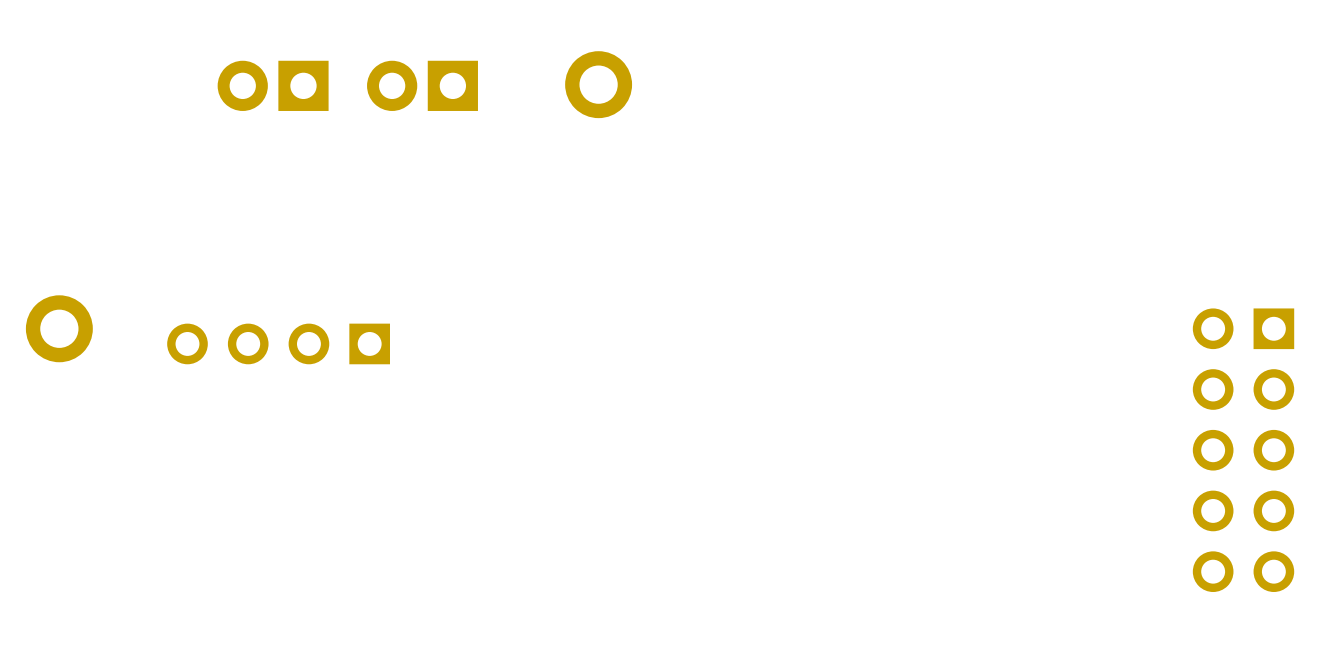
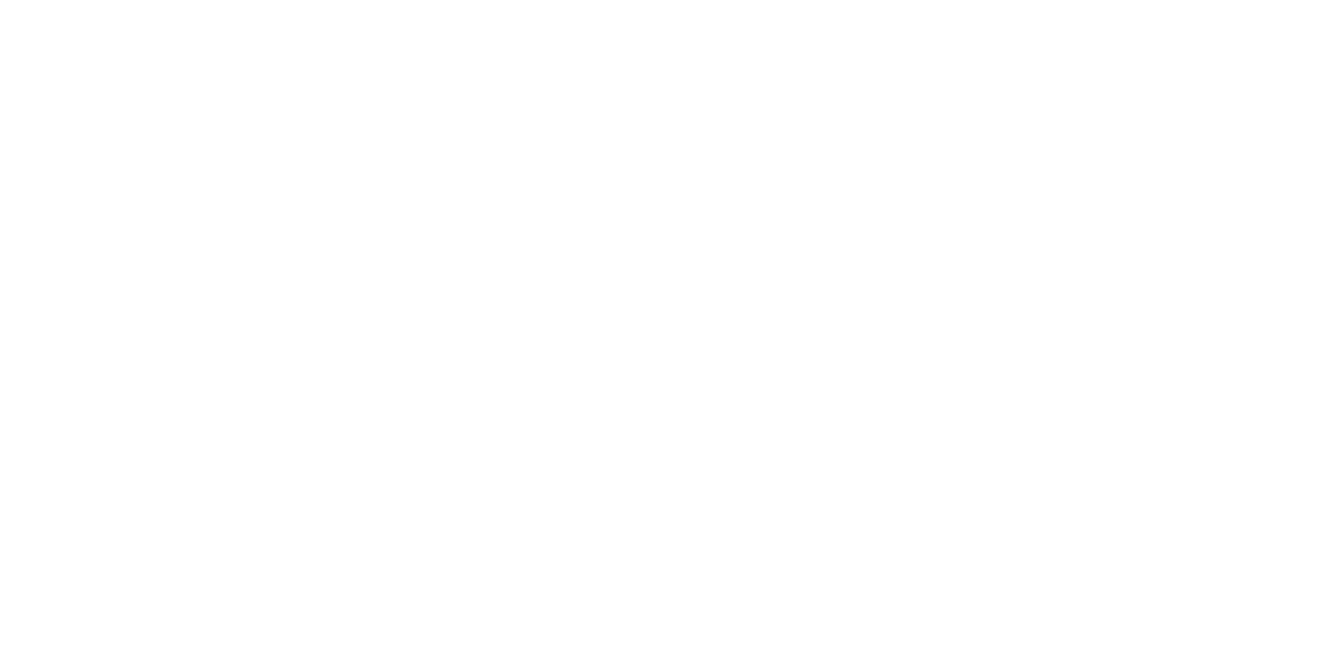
part: (598, 84) -> none
part: (273, 85) -> none
part: (422, 85) -> none
part: (59, 328) -> none
part: (278, 343) -> none
part: (1243, 450) -> none

